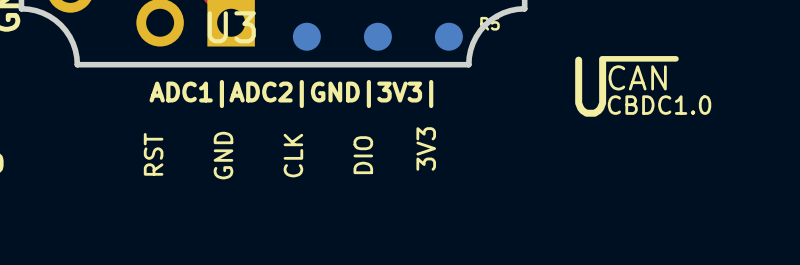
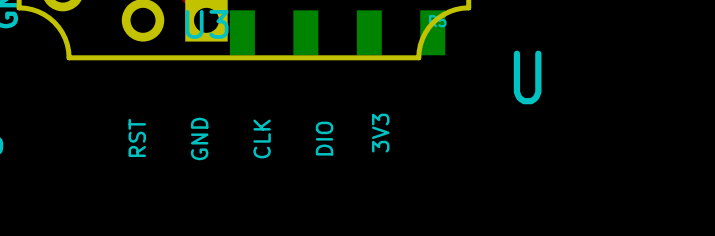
part footprint: [292, 22, 463, 51] -> [229, 10, 446, 56]
line: (602, 58) (675, 58) -> none
text: CAN (637, 77) -> none
text: ADC1|ADC2|GND|3V3| (291, 94) -> none
text: CBDC1.0 (659, 105) -> none

